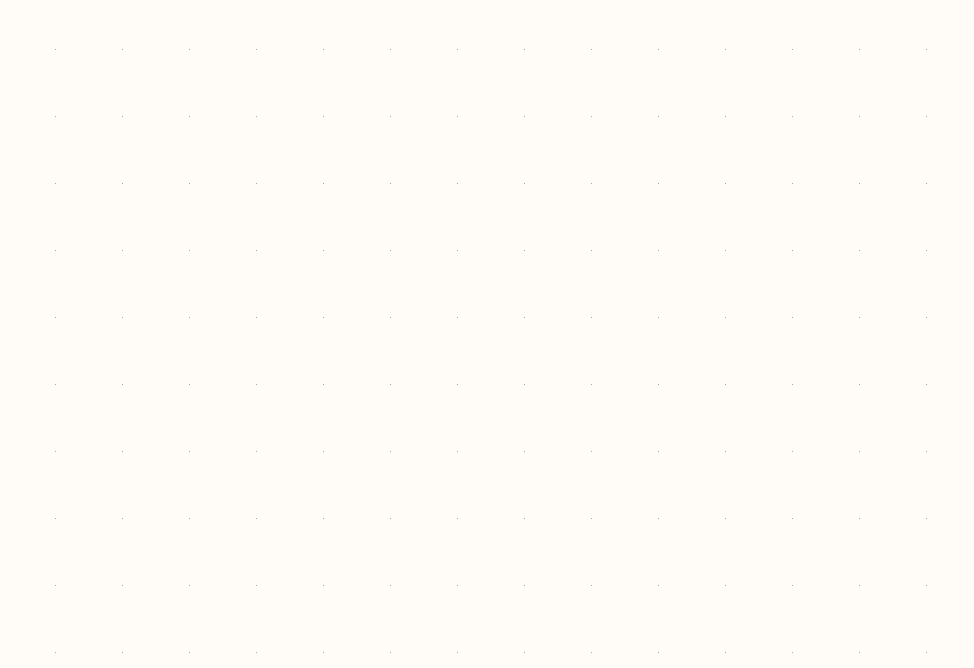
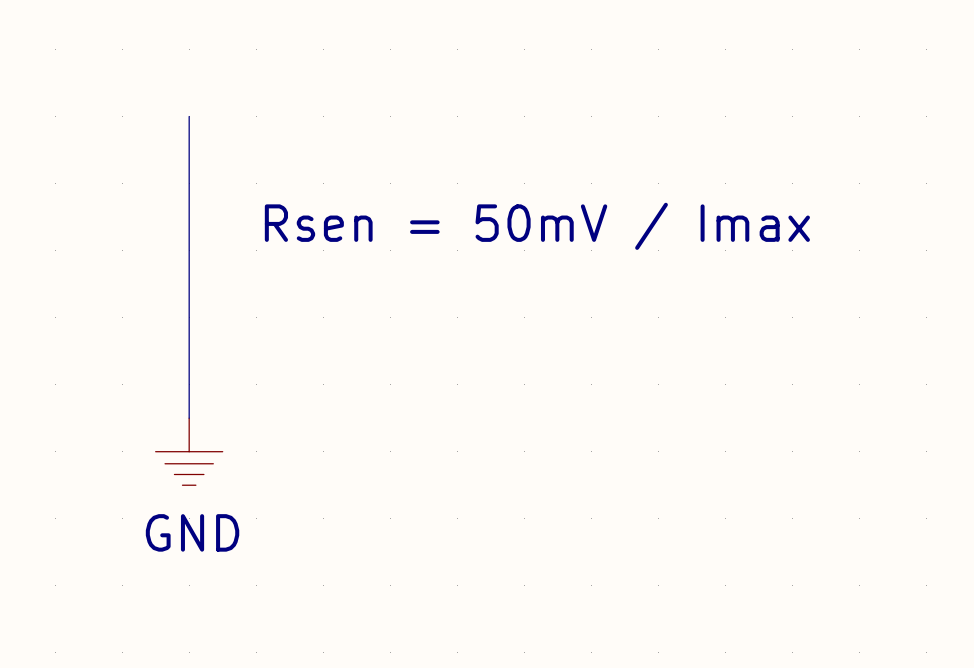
wire: none -> (189, 116) (189, 418)
text: none -> Rsen = 50mV / Imax (537, 226)
power symbol: none -> GND (189, 451)

